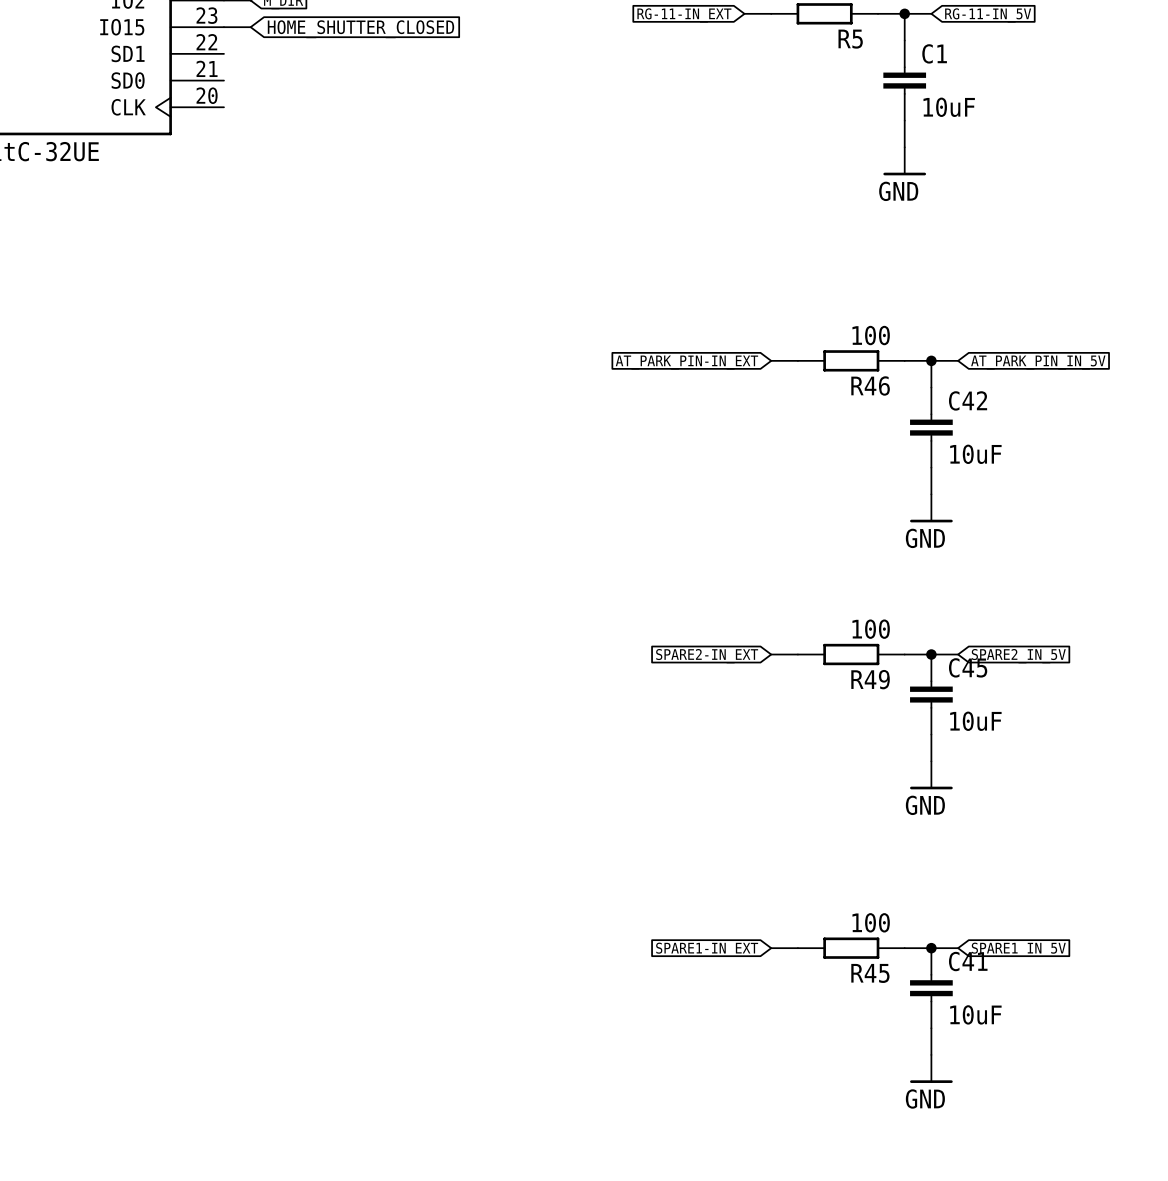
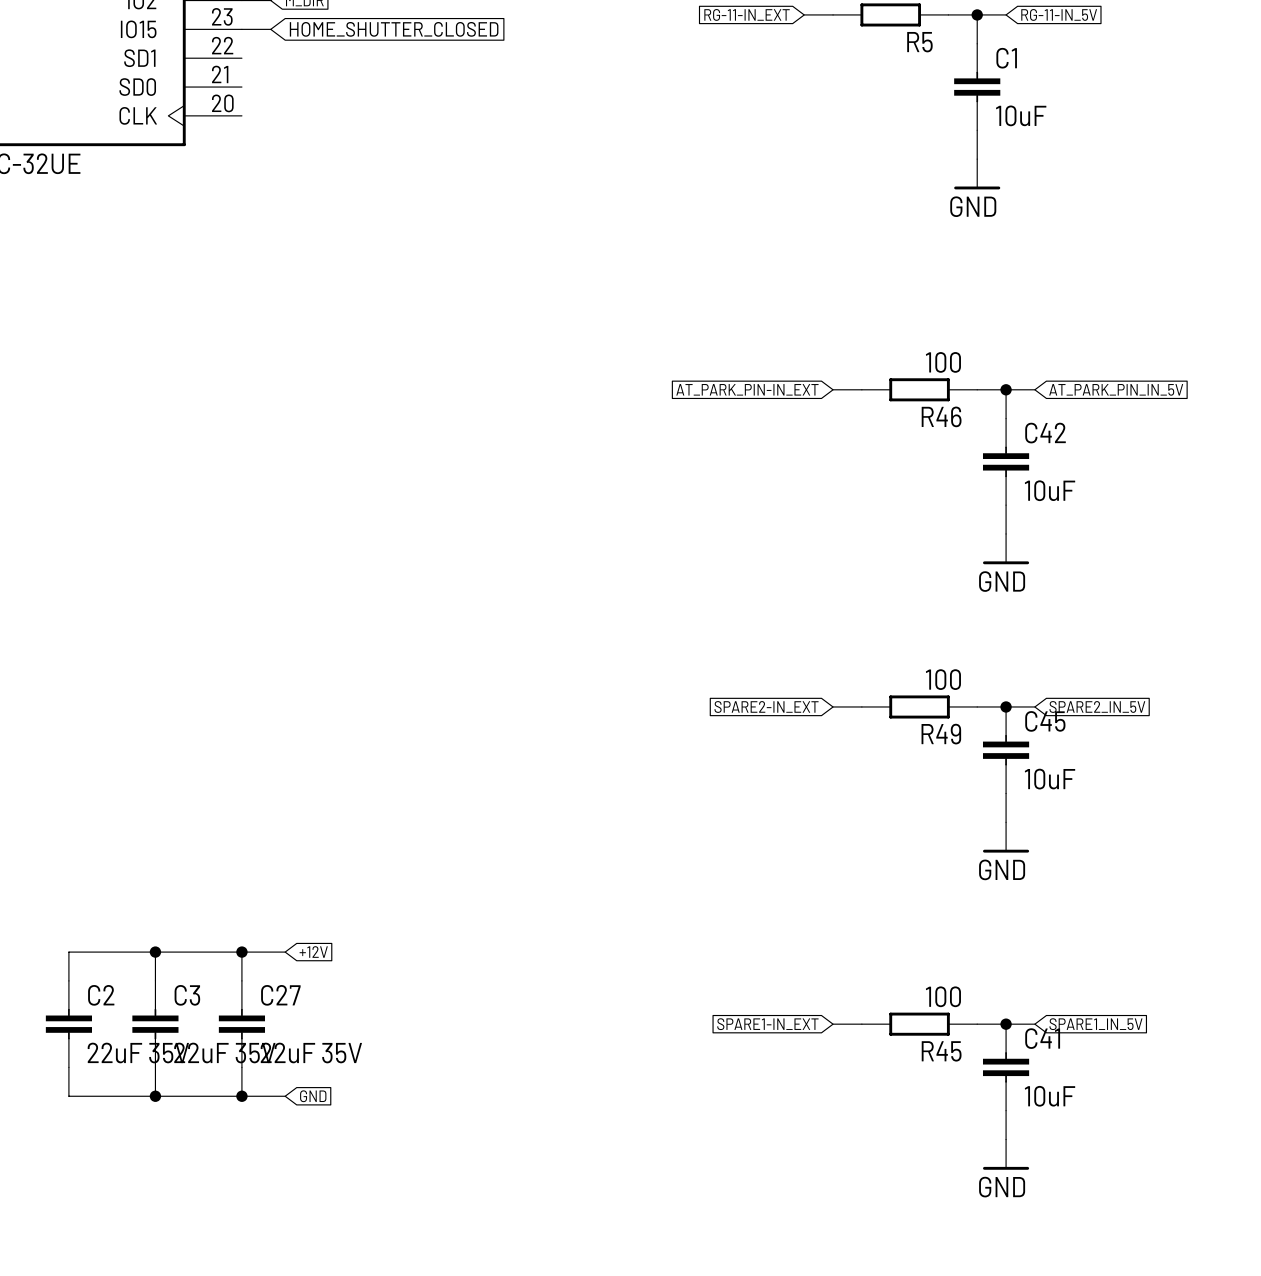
wire: none -> (155, 952) (155, 980)
junction: none -> (155, 952)
wire: none -> (241, 952) (241, 980)
junction: none -> (241, 952)
wire: none -> (285, 952) (68, 952) (68, 980)
global label: none -> +12V (313, 952)
C2: none -> 22uF 35V (68, 1024)
C3: none -> 22uF 35V (155, 1024)
C27: none -> 22uF 35V (241, 1024)
wire: none -> (68, 1067) (68, 1096) (285, 1096)
wire: none -> (155, 1067) (155, 1096)
wire: none -> (241, 1067) (241, 1096)
junction: none -> (155, 1096)
junction: none -> (241, 1096)
global label: none -> GND (313, 1096)

